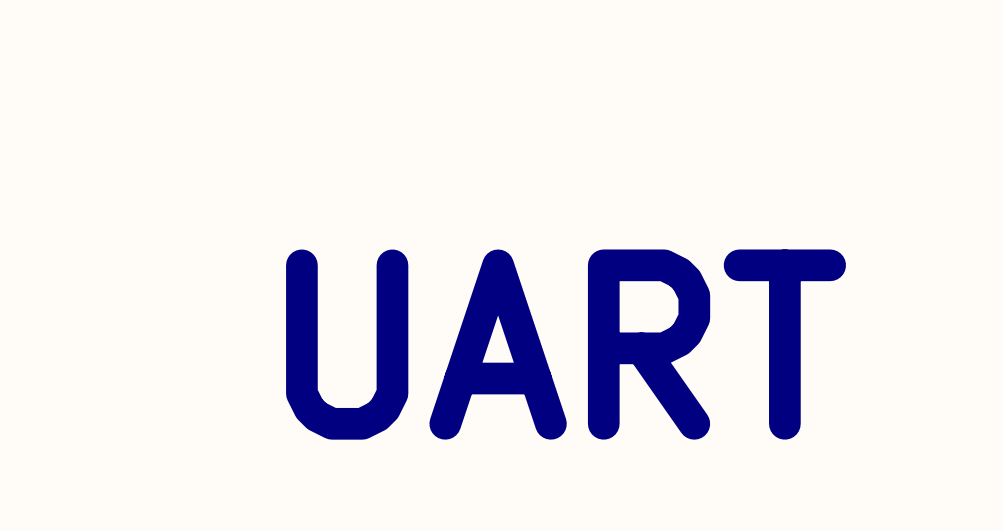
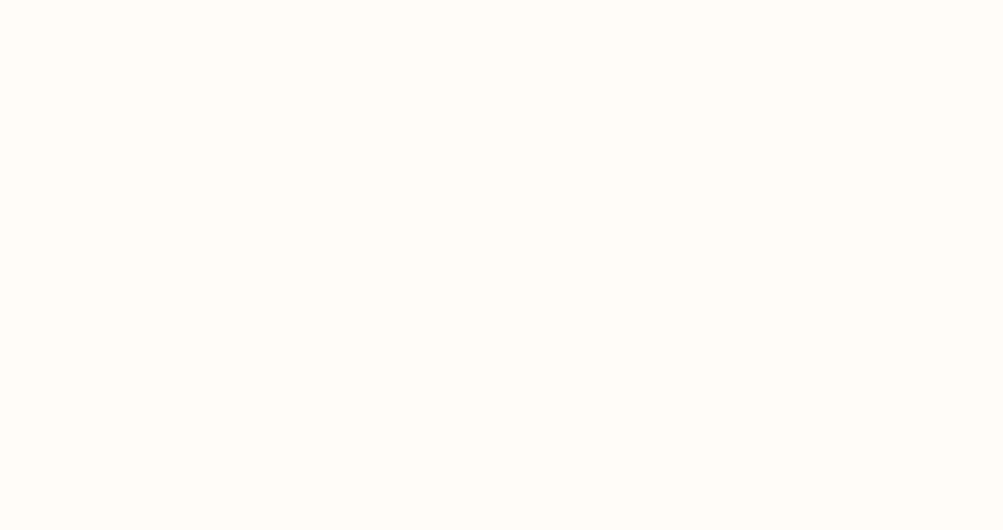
text: UART (566, 344) -> none

